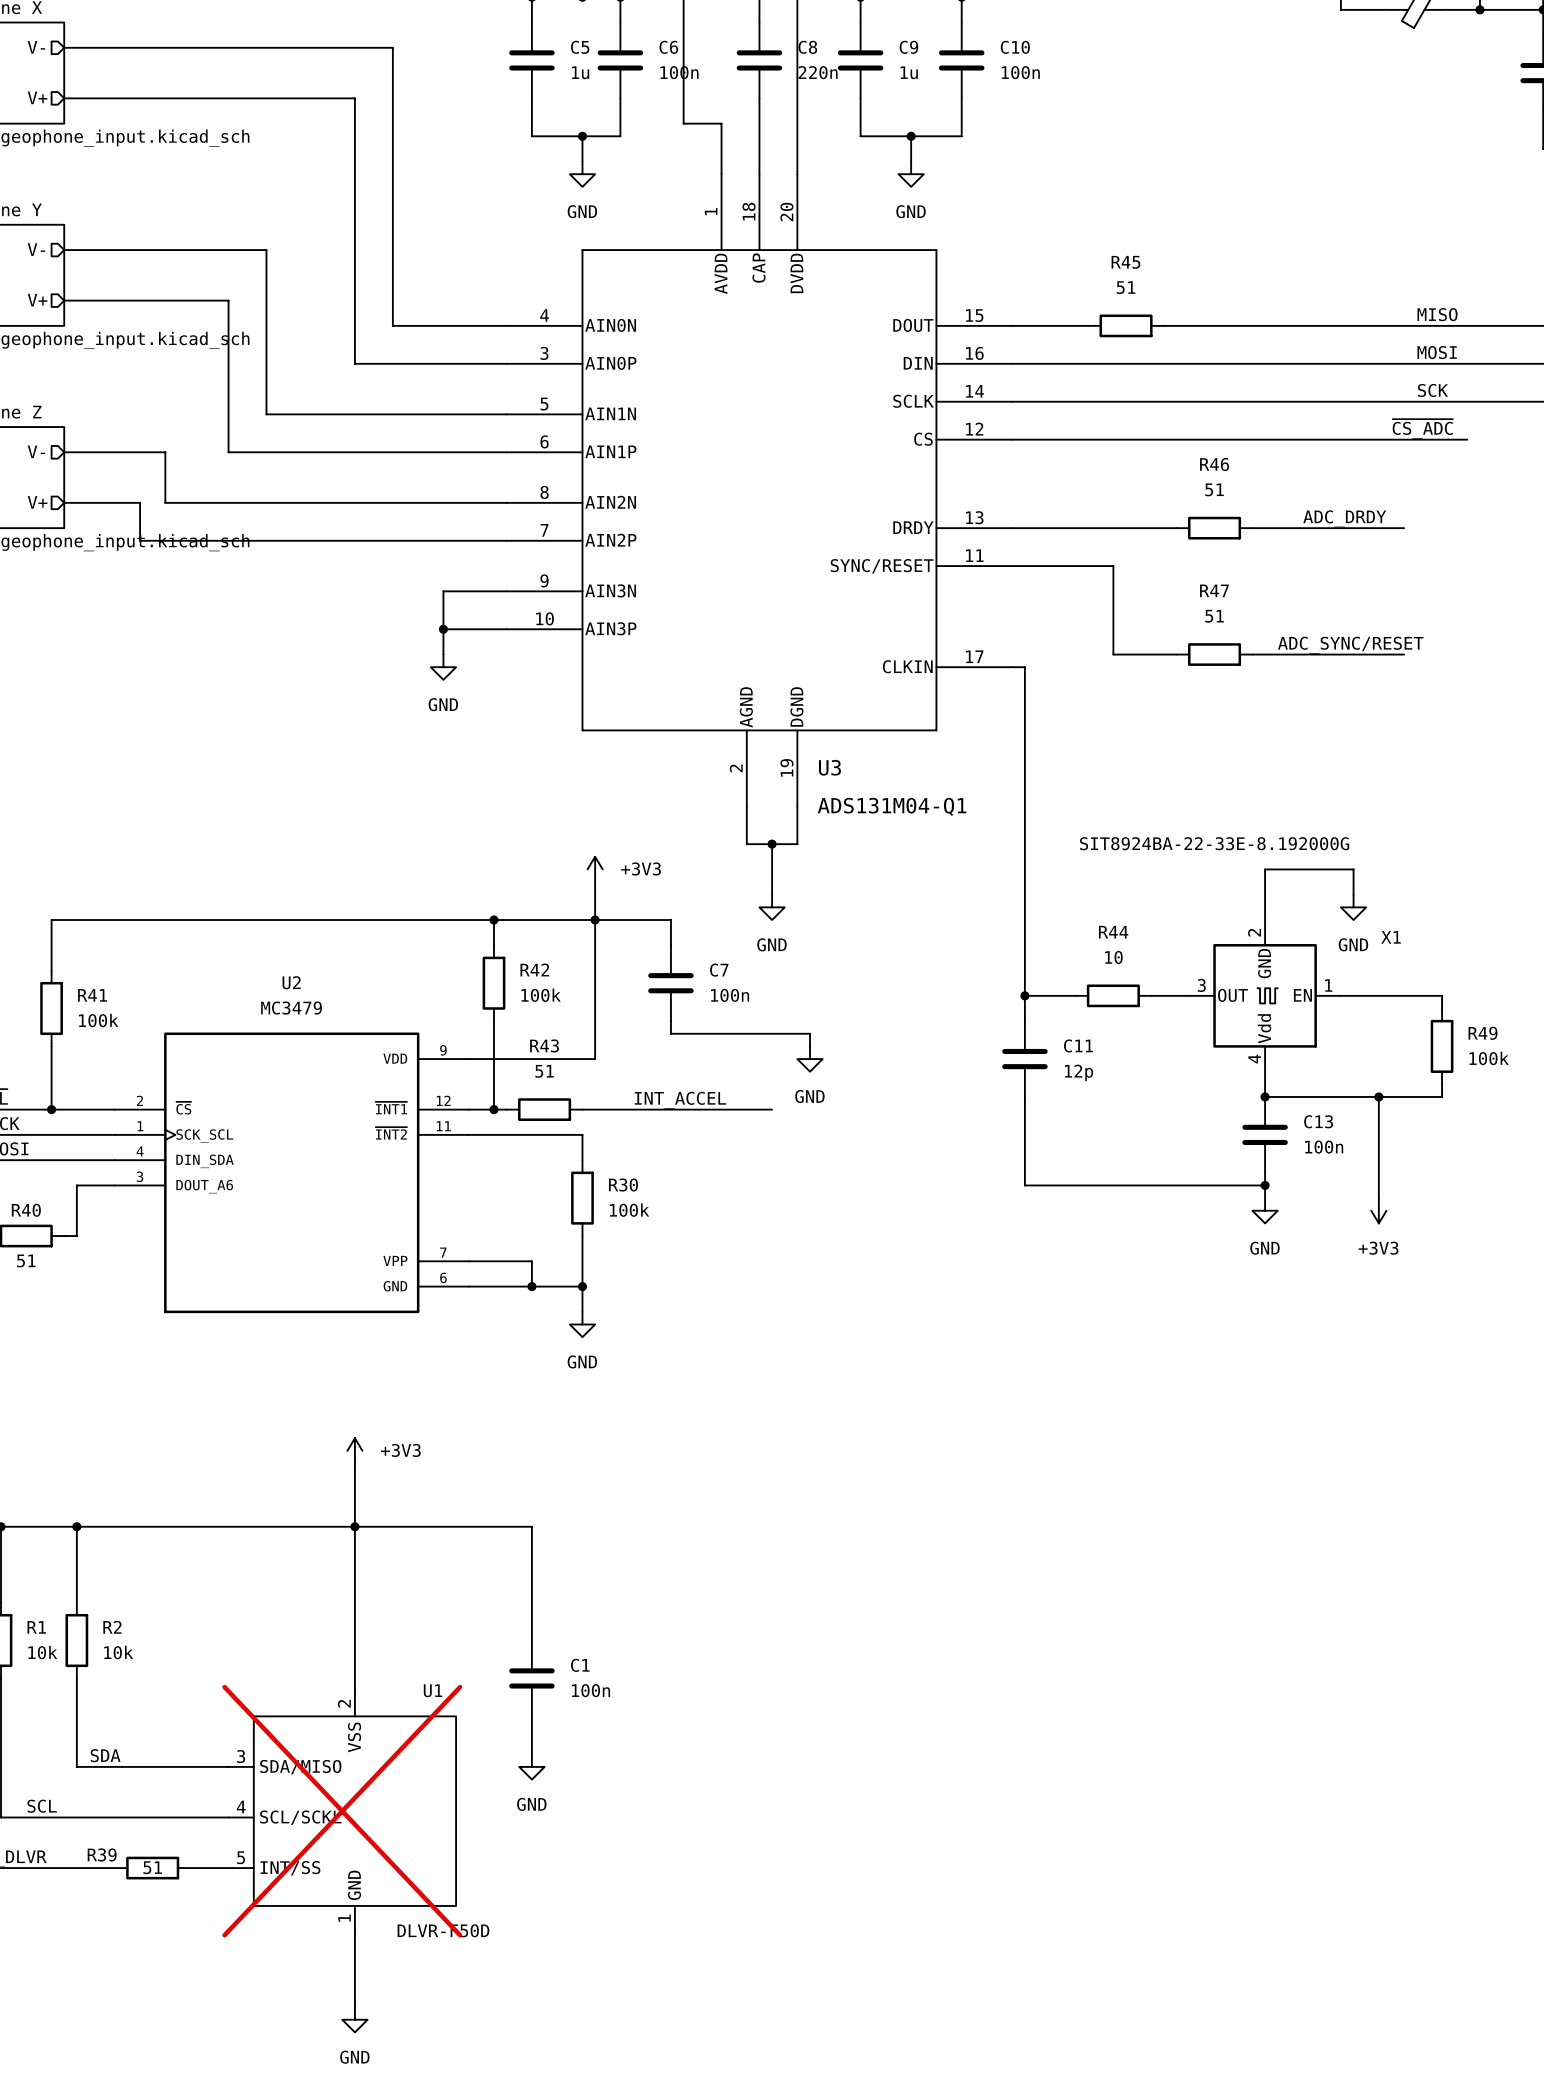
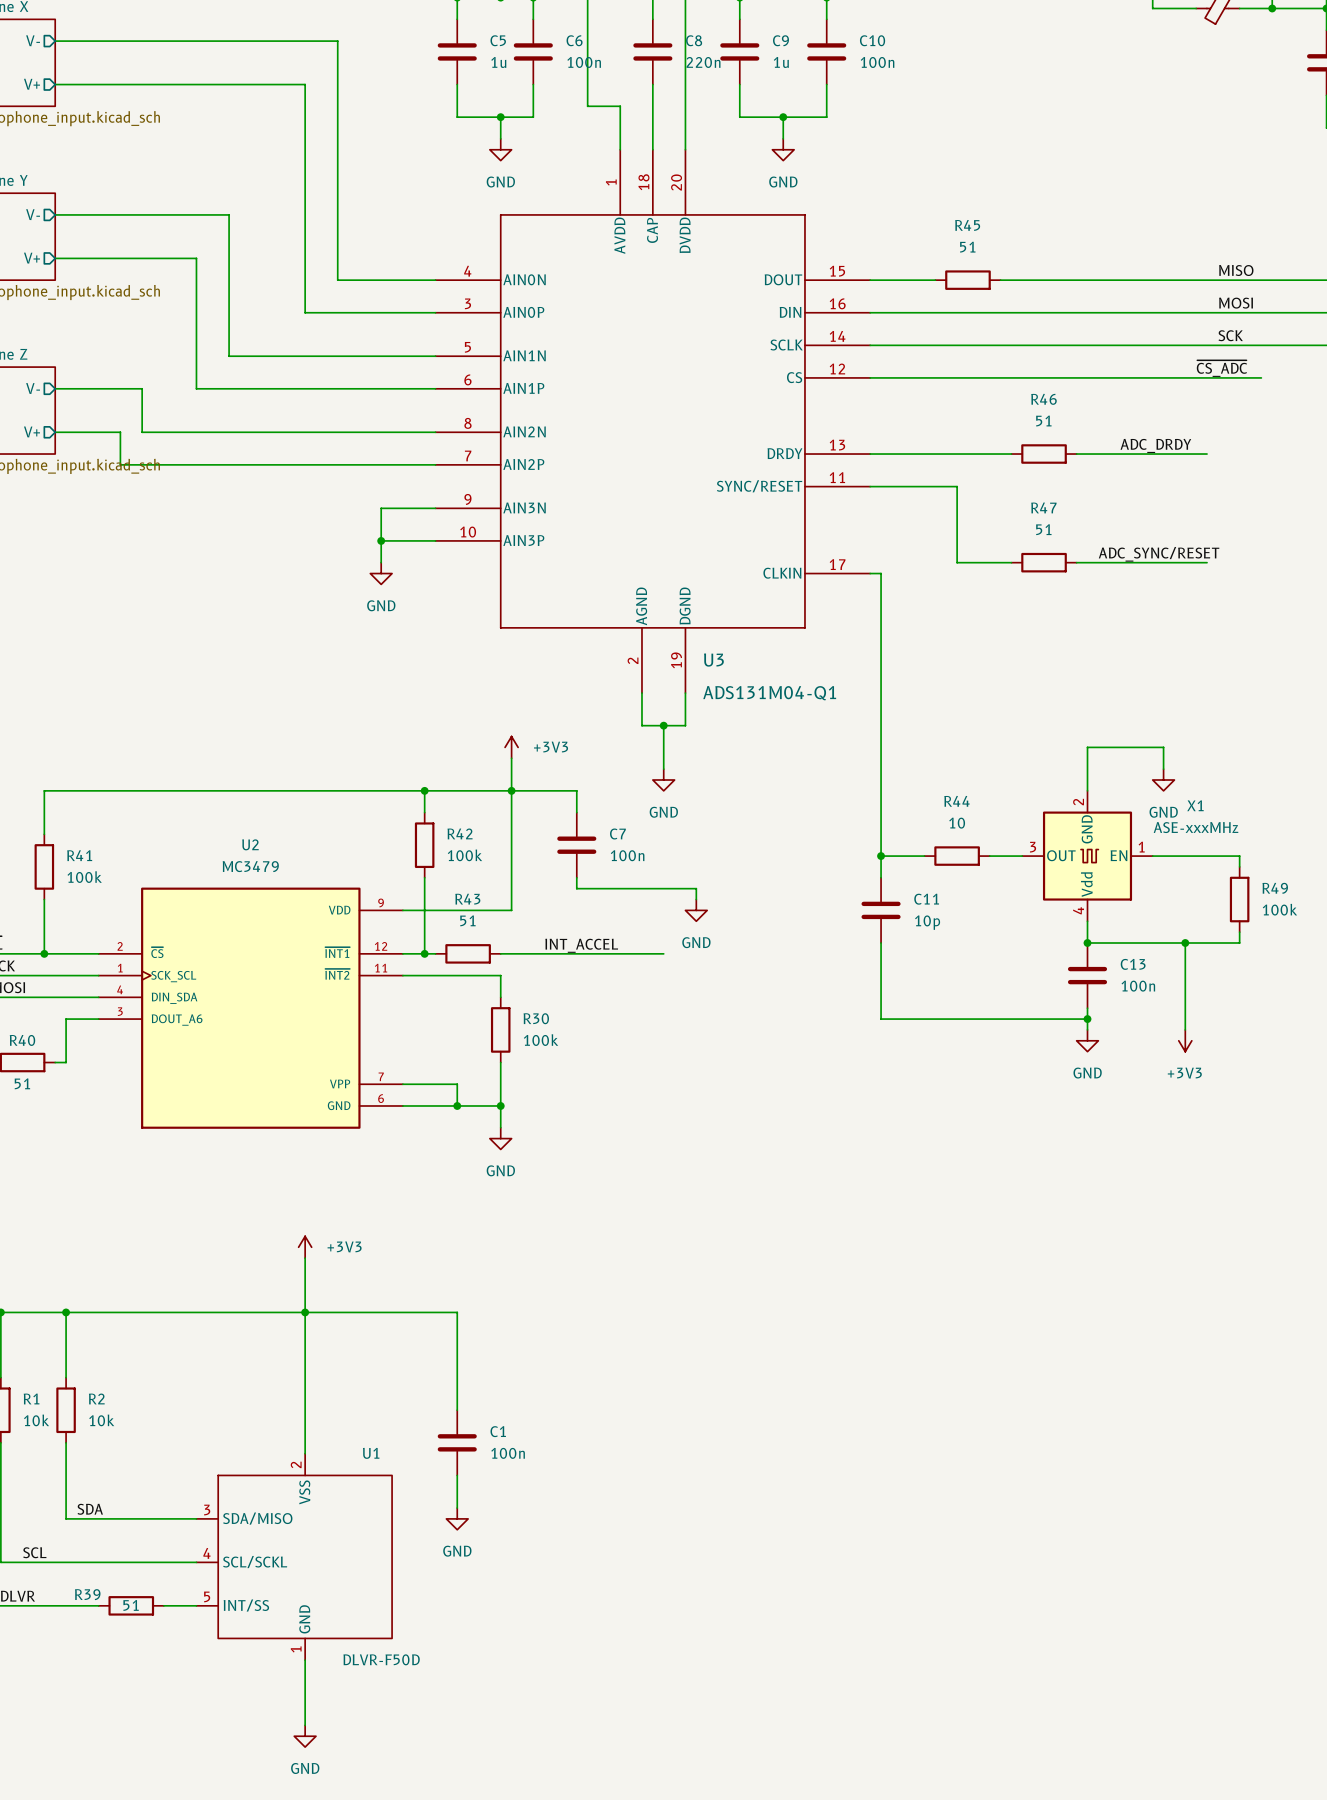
X1 value: SIT8924BA-22-33E-8.192000G (1214, 843) -> ASE-xxxMHz (1196, 827)
C11 value: 12p (1079, 1072) -> 10p (927, 922)
U1 do-not-place cross: (342, 1811) -> none

